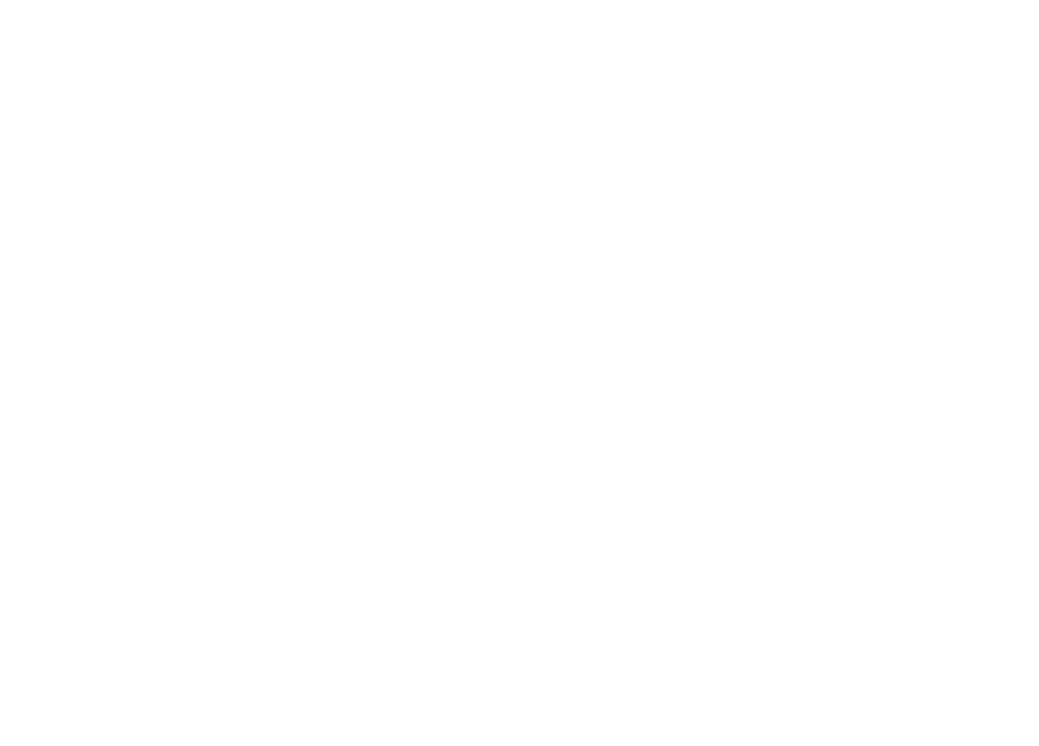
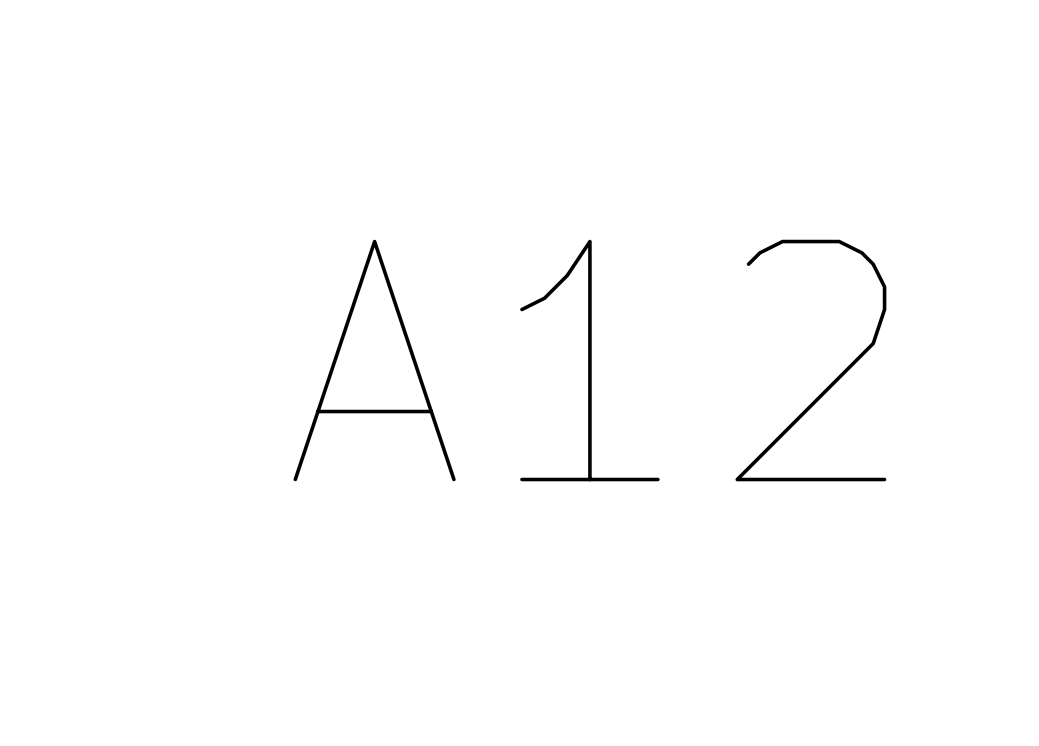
text: none -> A12 (589, 360)

